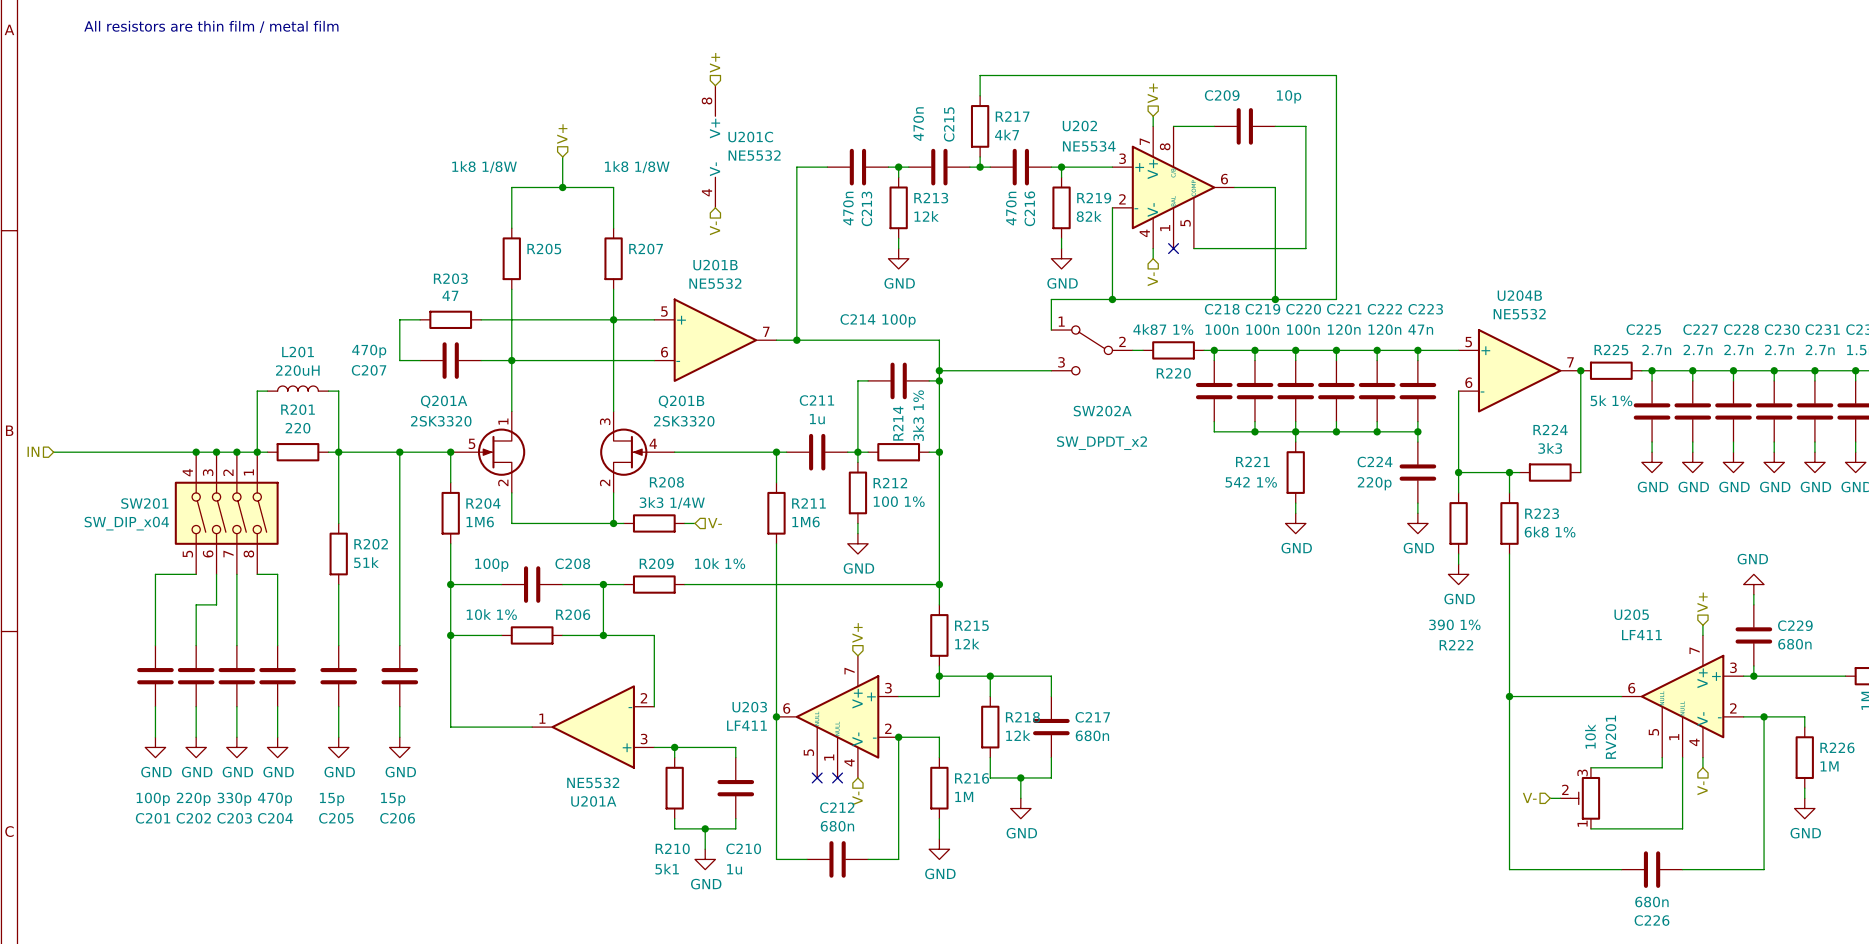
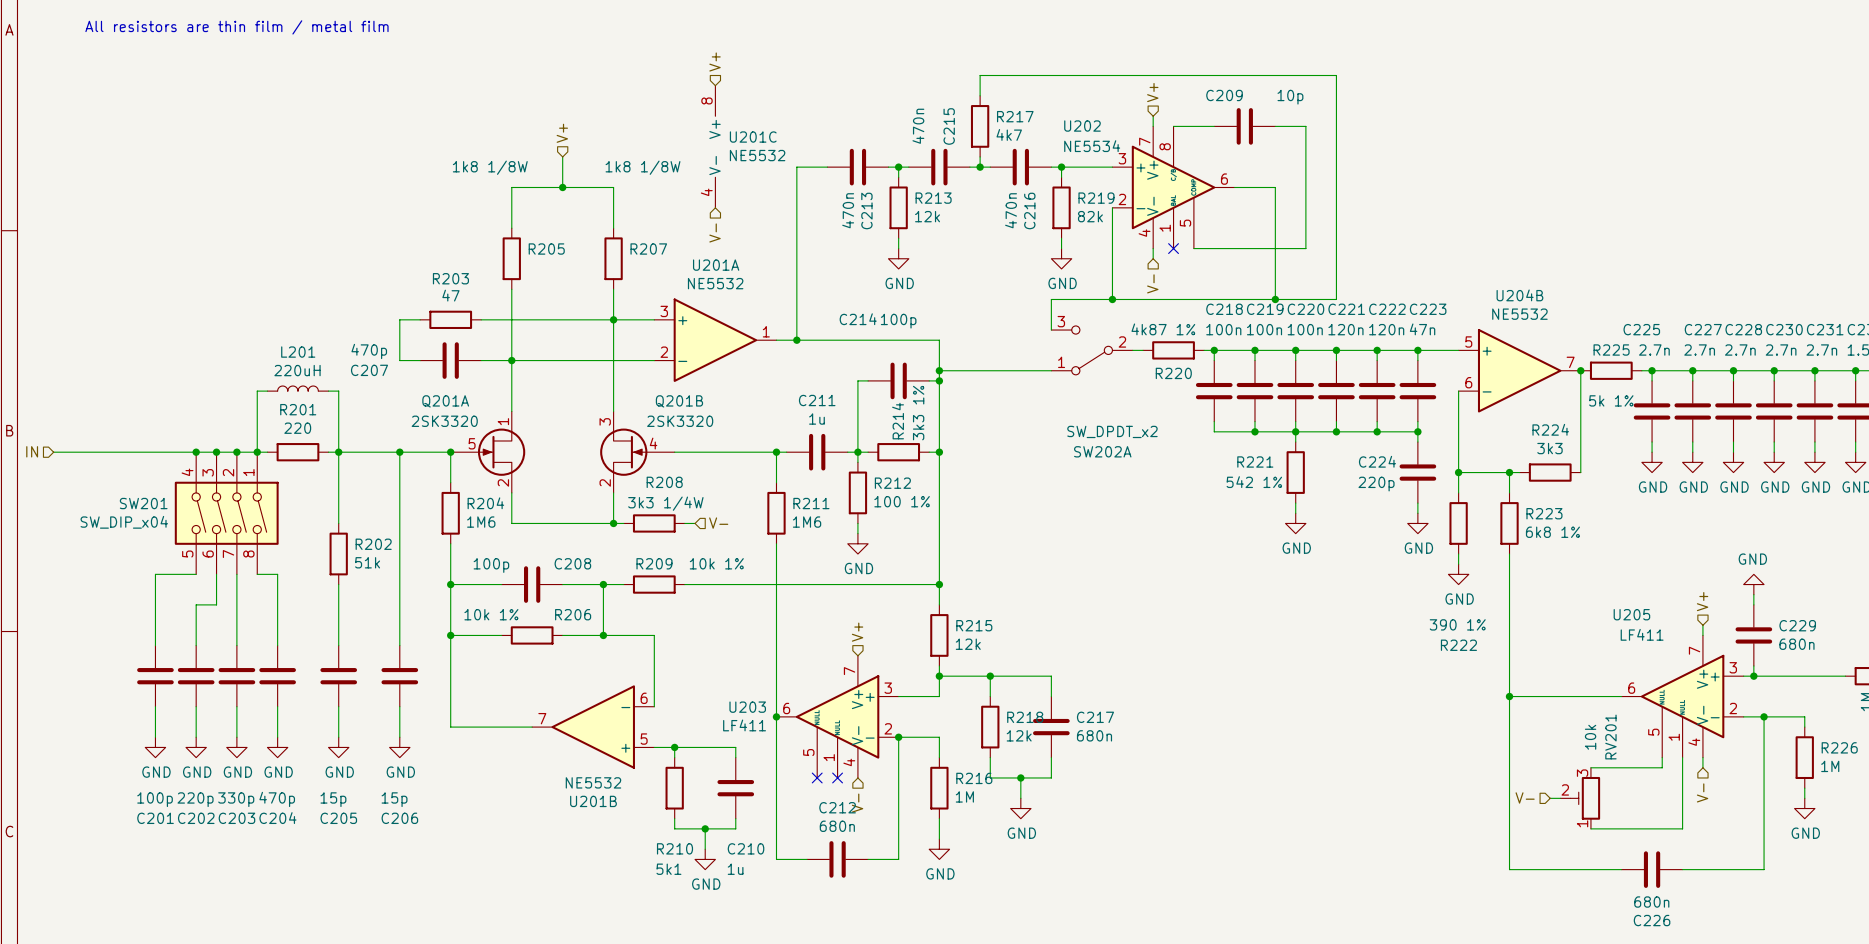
U201B rotation: 0° (715, 340) -> 180° (593, 727)
U201B position: (715, 340) -> (593, 727)
SW202A flip: as is (1092, 350) -> up-down (1092, 350)
SW202A name position: SW202A (1102, 411) -> SW202A (1102, 451)
U201A rotation: 0° (593, 727) -> 180° (715, 340)
U201A position: (593, 727) -> (715, 340)

